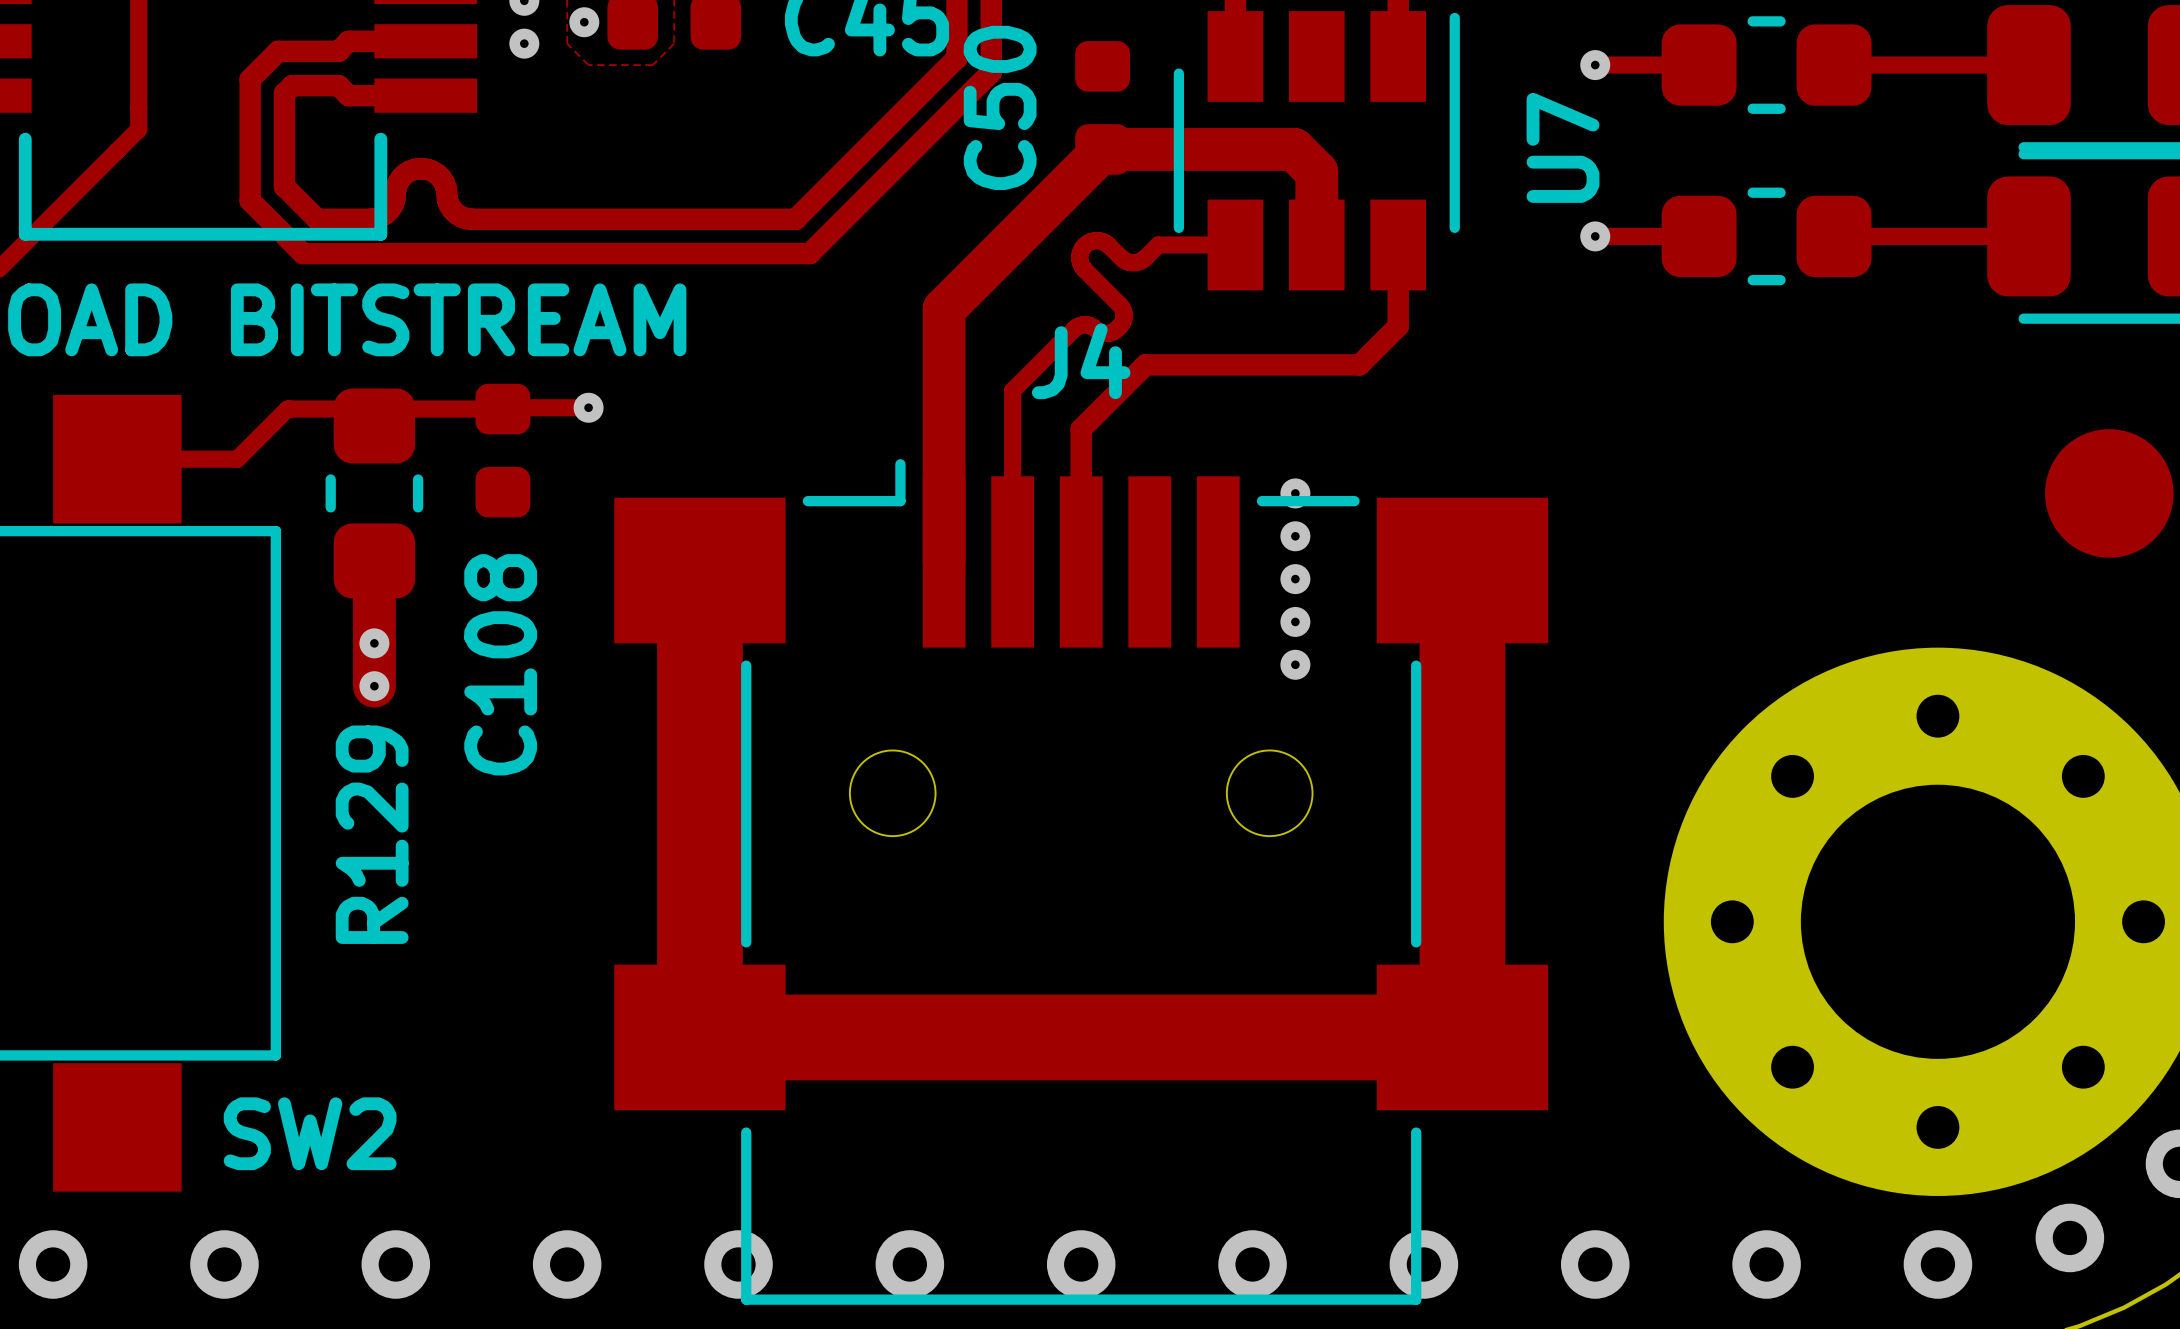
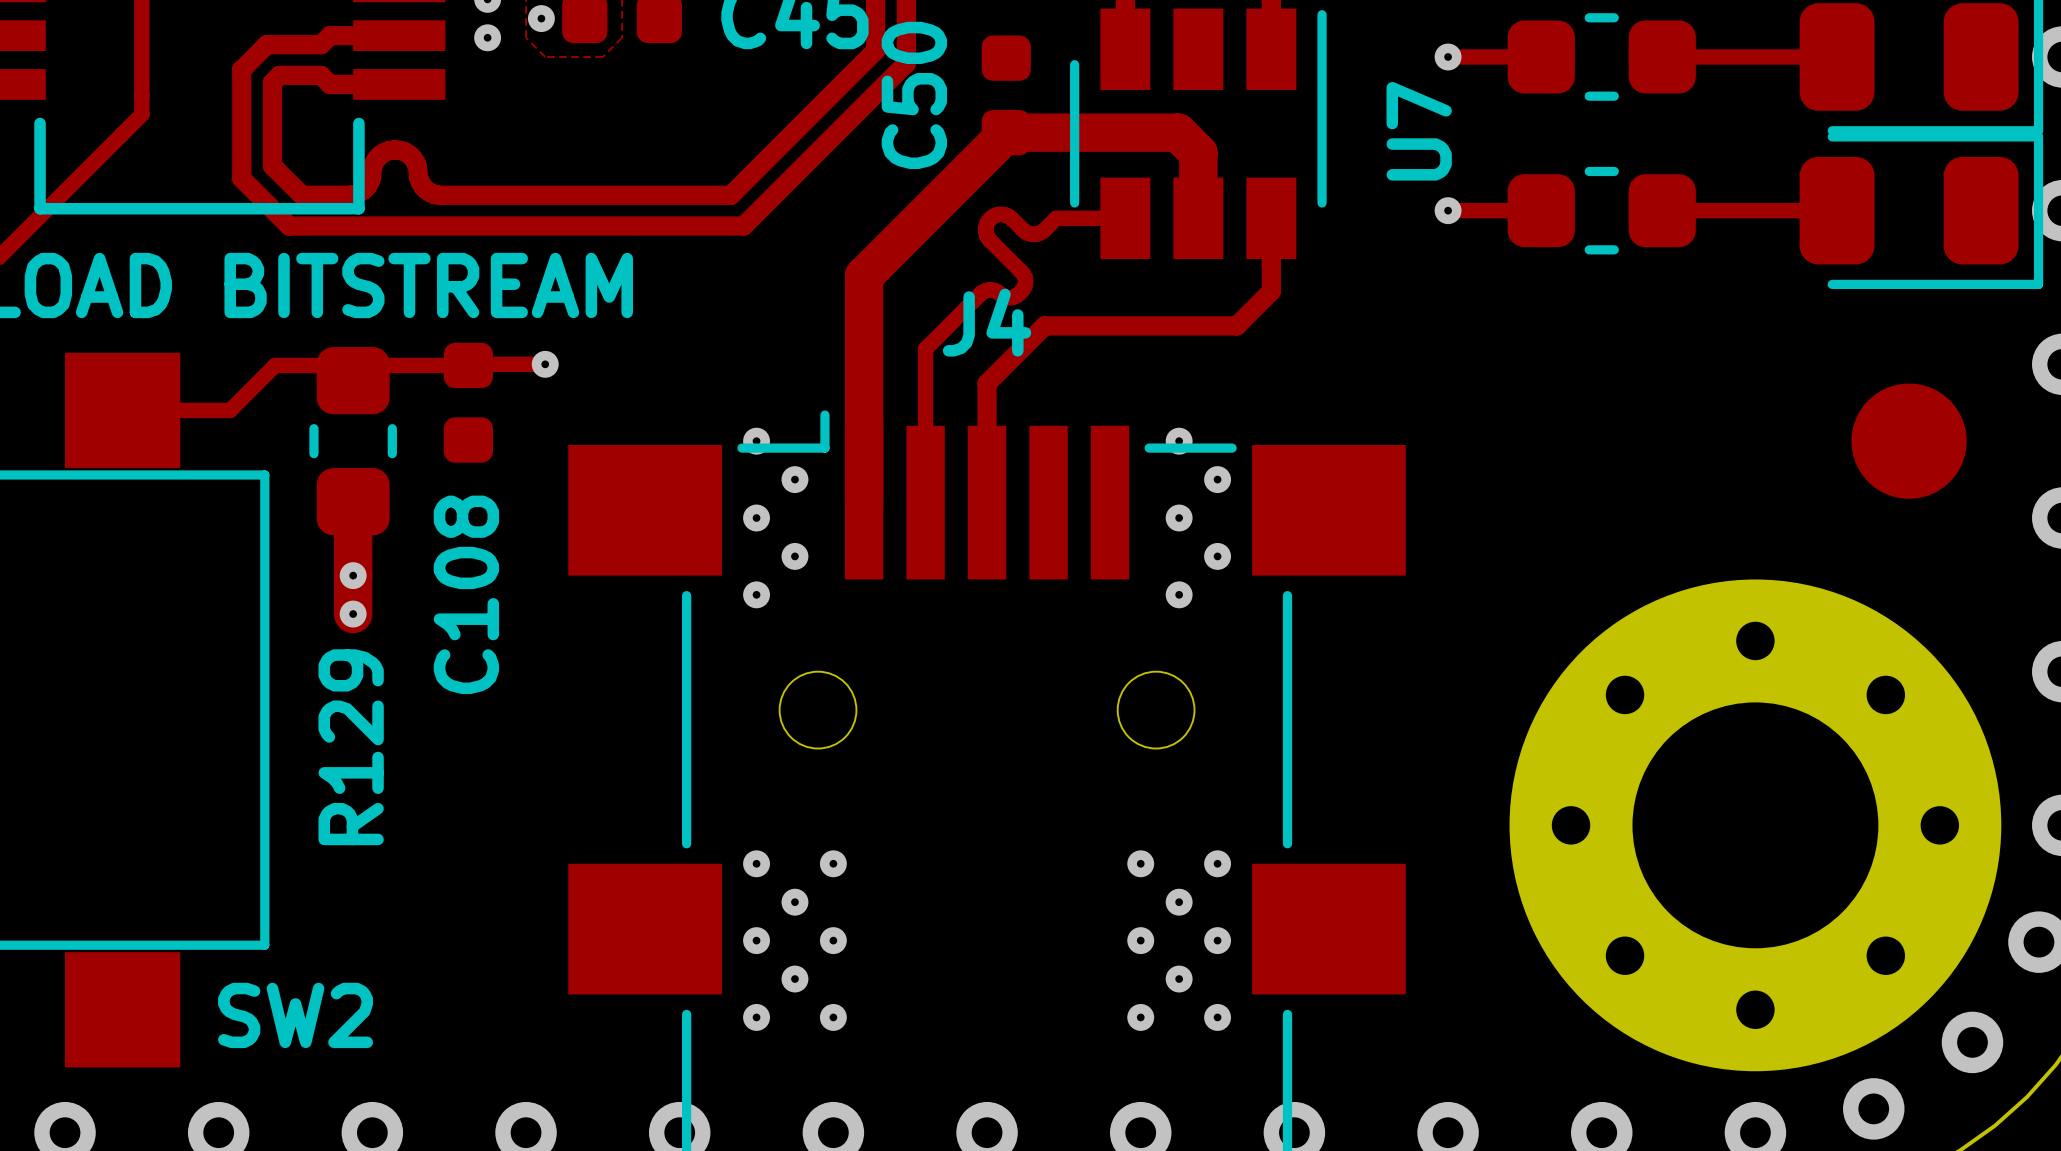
via: none -> (756, 441)
via: none -> (794, 479)
via position: (1295, 536) -> (1217, 479)
track: (699, 570) (699, 1037) (1462, 1037) (1462, 570) -> none
via: none -> (756, 518)
via: none -> (794, 556)
via position: (1295, 621) -> (1217, 556)
via: none -> (756, 594)
via: none -> (756, 863)
via: none -> (833, 863)
via: none -> (1140, 863)
via: none -> (1217, 863)
via: none -> (794, 902)
via: none -> (1179, 902)
via: none -> (756, 940)
via: none -> (833, 940)
via: none -> (1140, 940)
via: none -> (1217, 940)
via: none -> (794, 979)
via: none -> (1179, 979)
via: none -> (756, 1017)
via: none -> (833, 1017)
via: none -> (1140, 1017)
via: none -> (1217, 1017)

